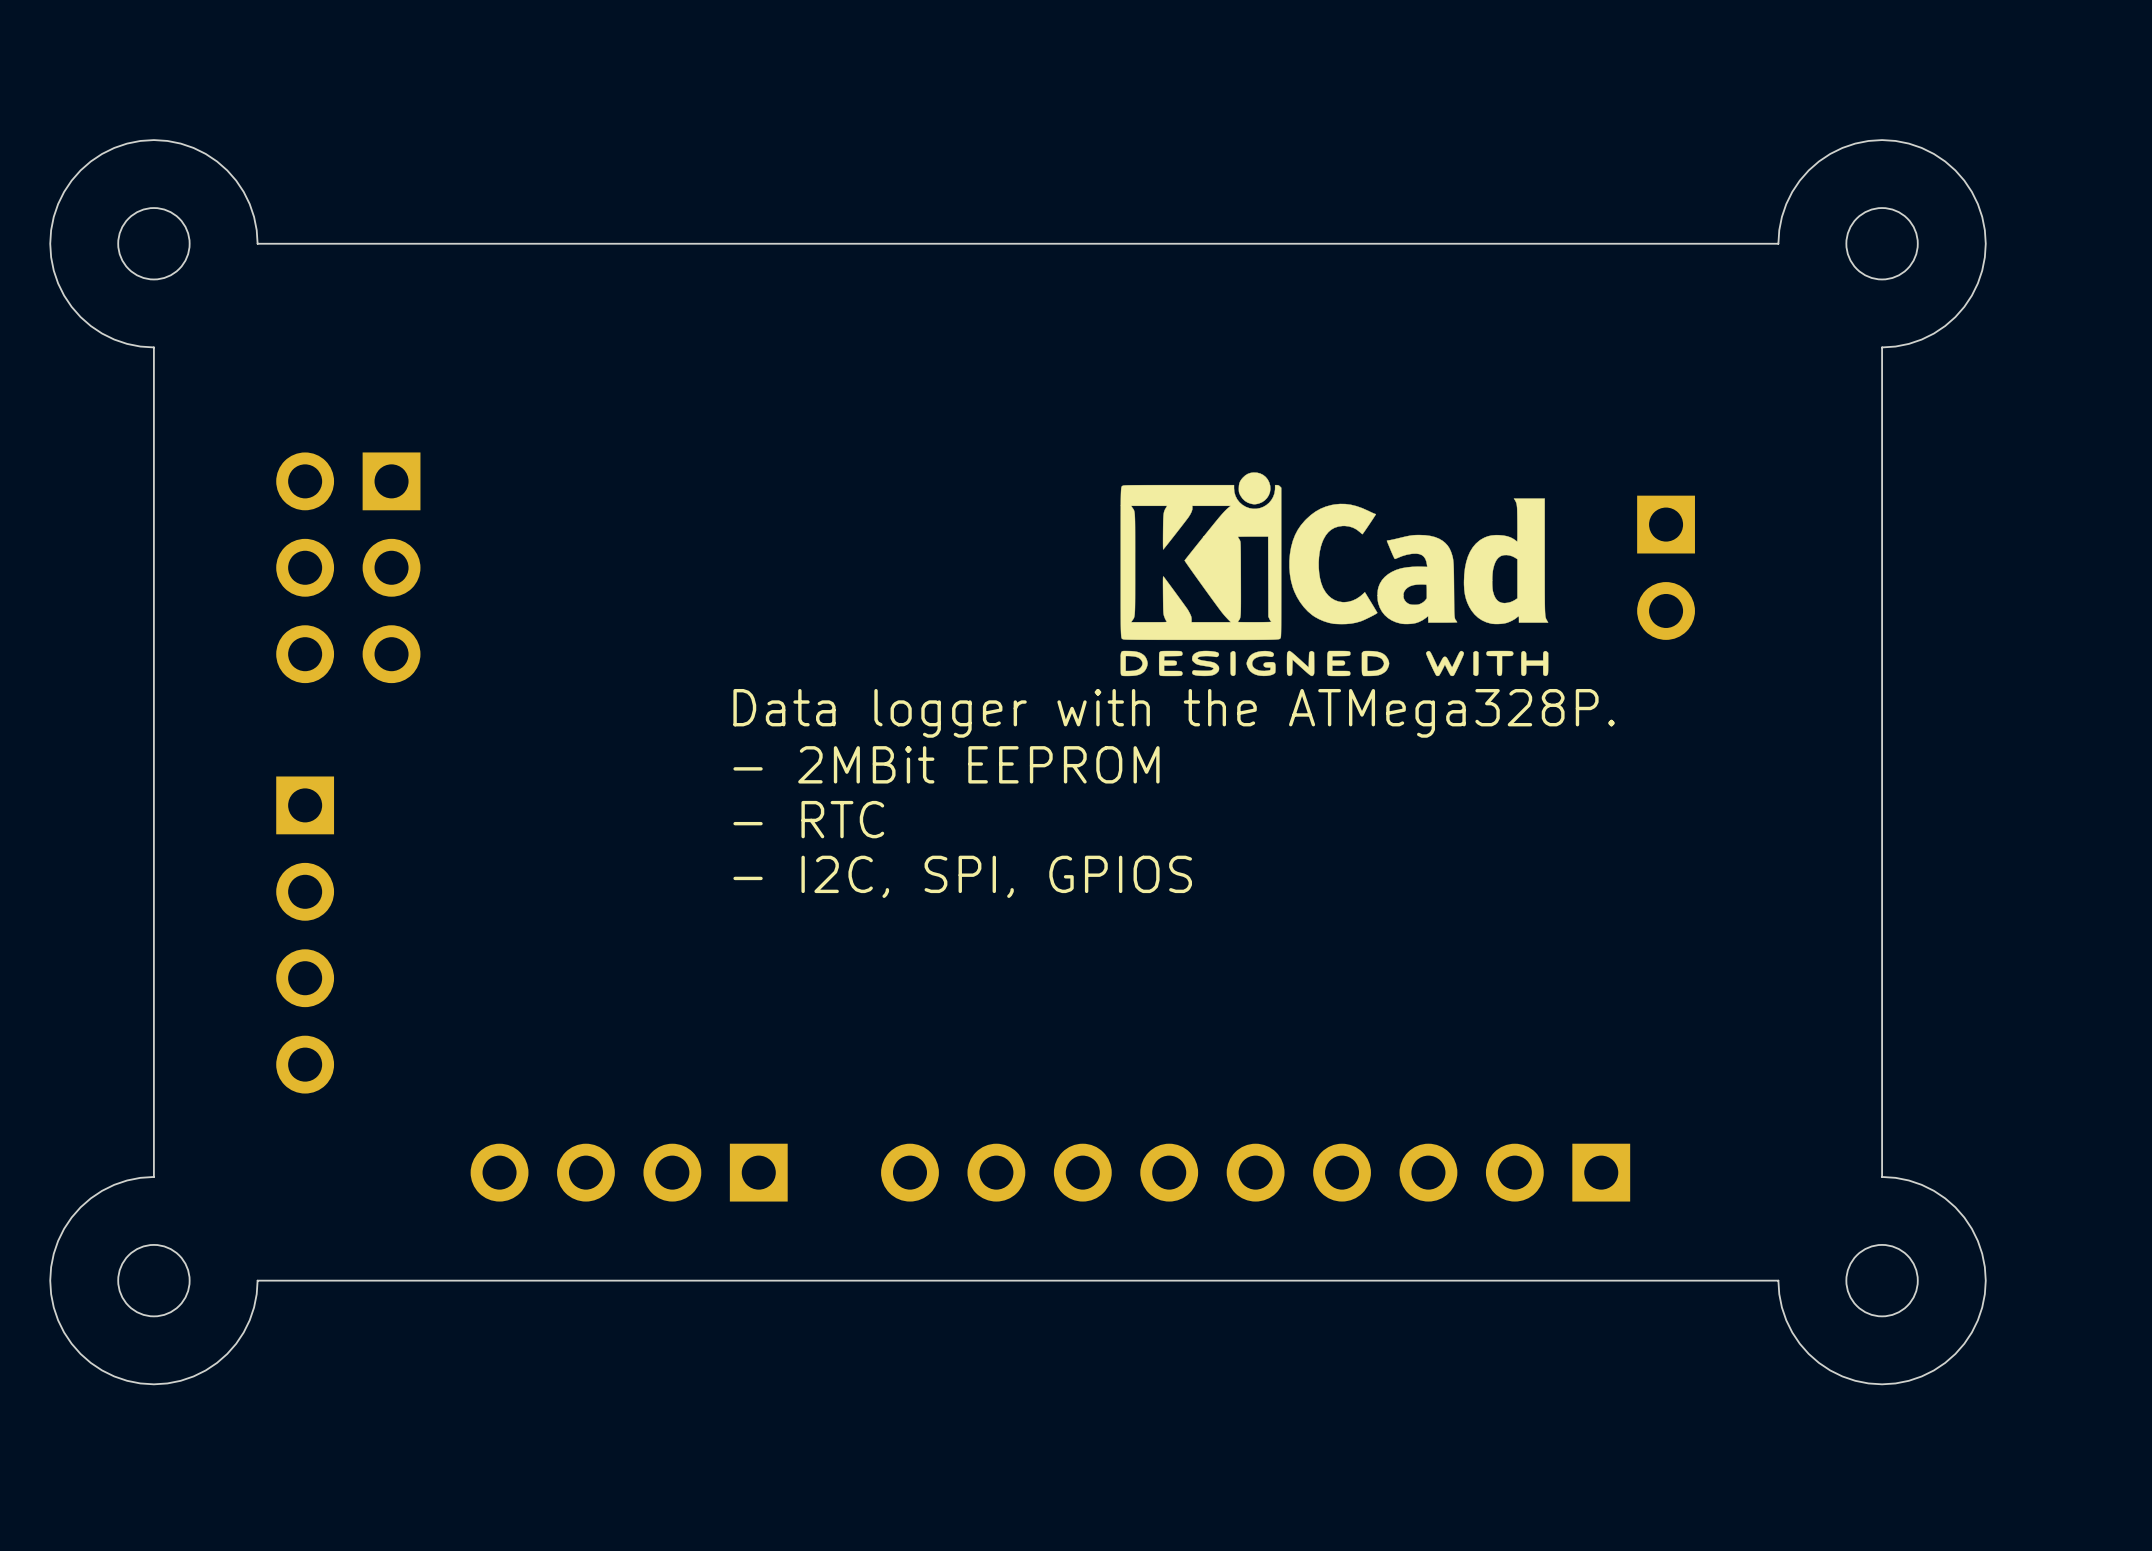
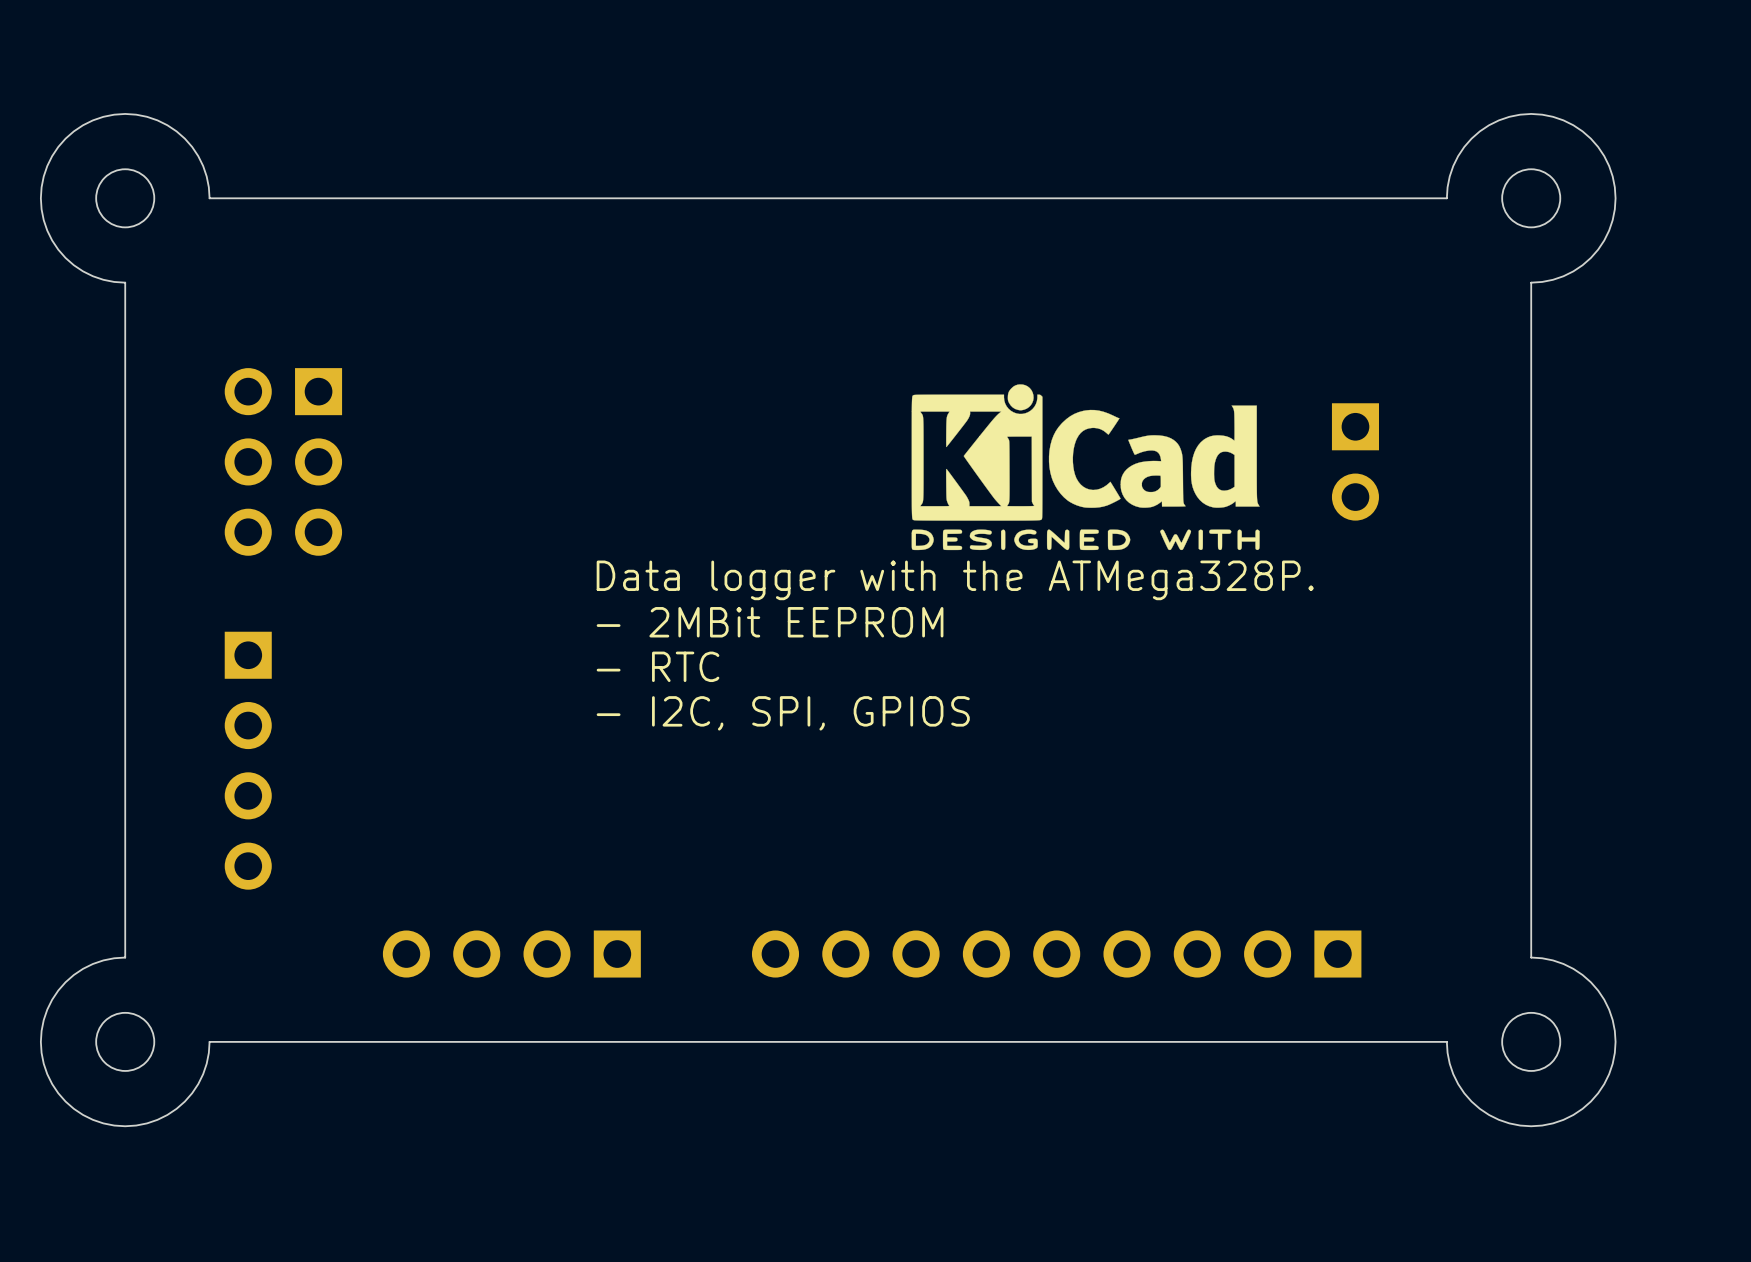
part position: (1255, 1172) -> (1056, 954)

